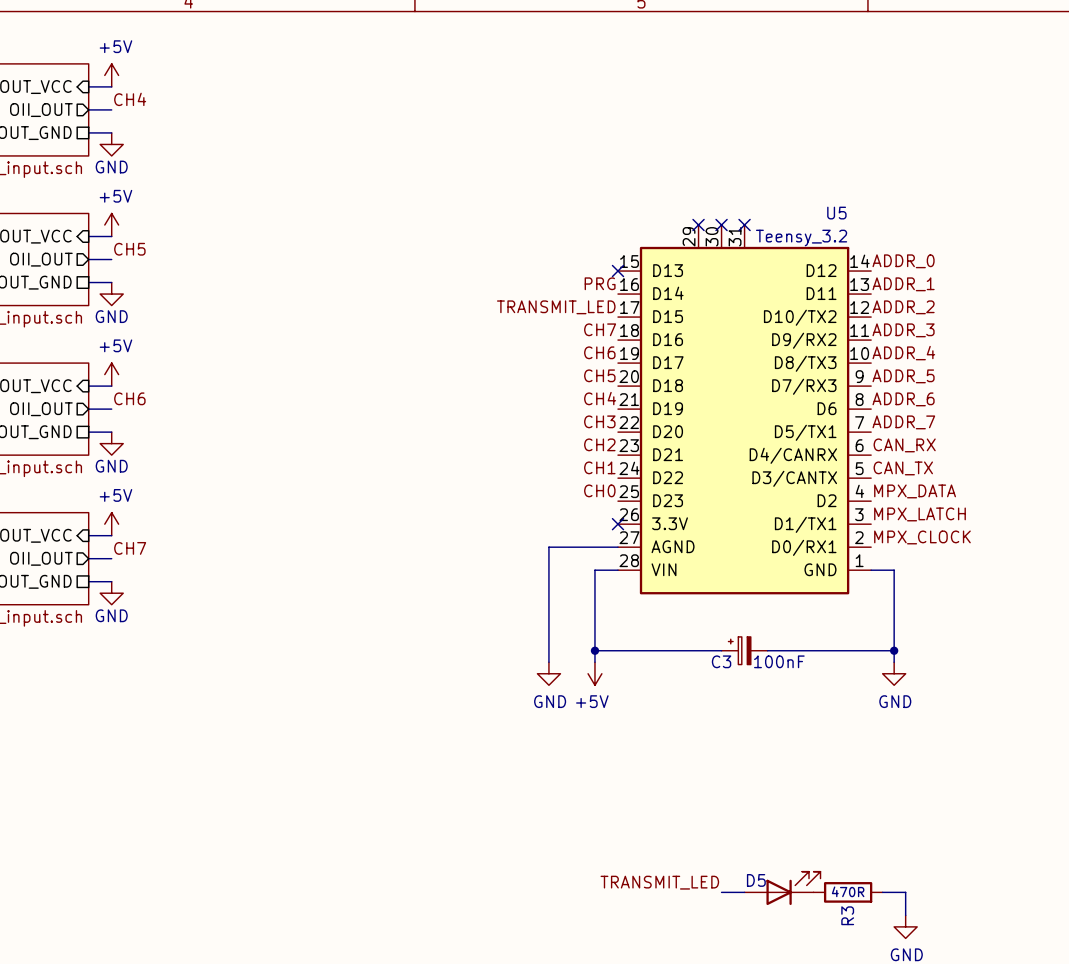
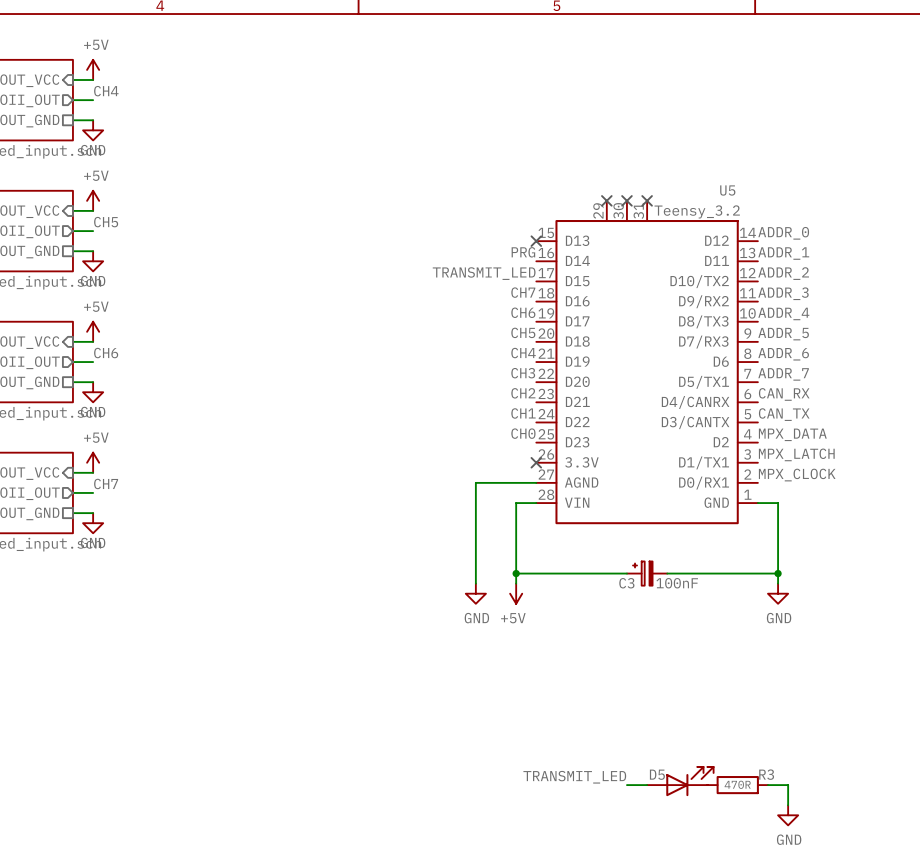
R3 name rotation: 0° (847, 915) -> 90° clockwise (766, 774)
R3 name position: R3 (847, 915) -> R3 (766, 774)

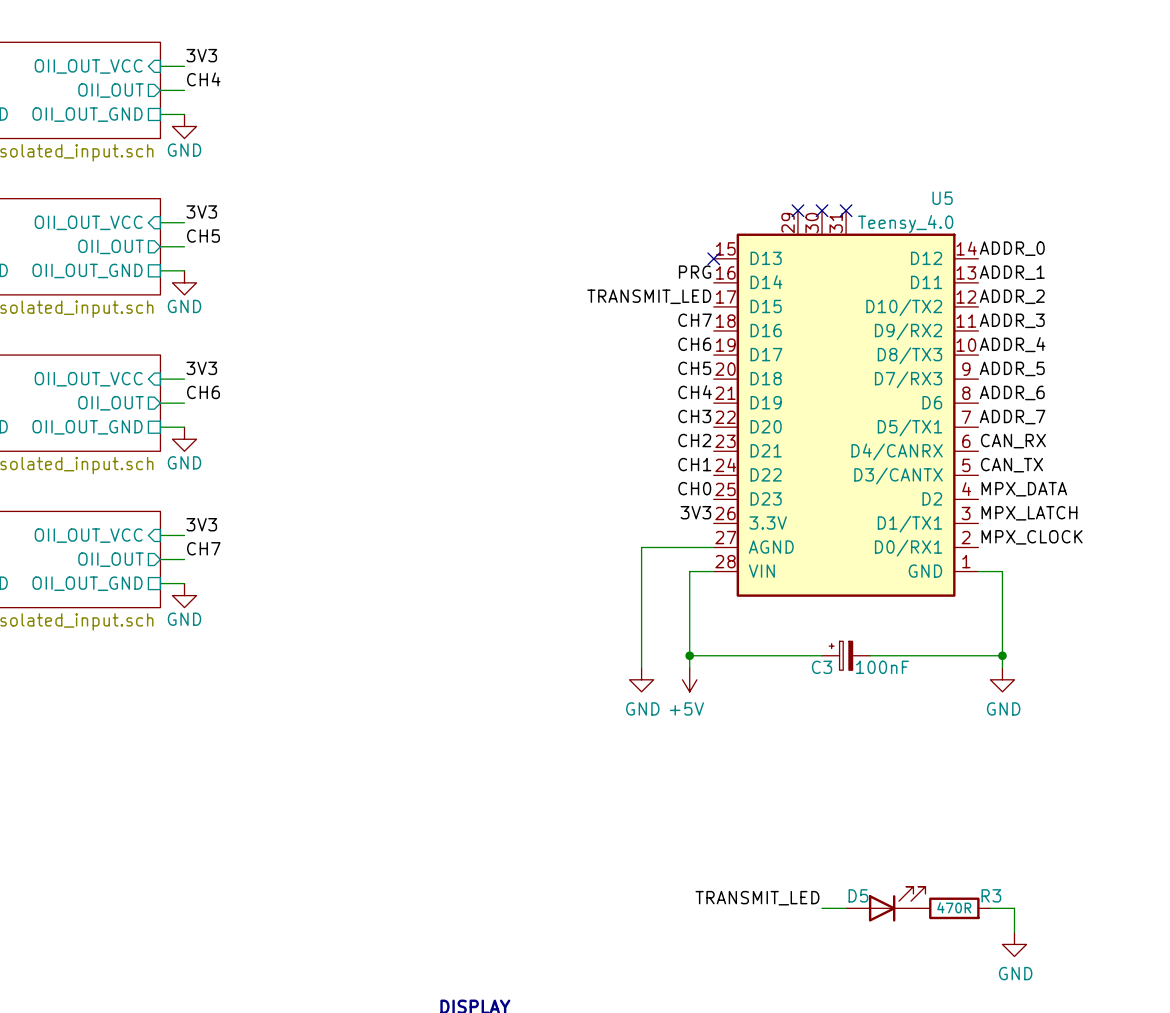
power symbol: +5V (93, 69) -> none
label: none -> 3V3 (201, 55)
power symbol: +5V (93, 200) -> none
label: none -> 3V3 (201, 211)
U5 value: Teensy_3.2 (697, 211) -> Teensy_4.0 (905, 223)
power symbol: +5V (93, 331) -> none
label: none -> 3V3 (201, 368)
label: none -> 3V3 (695, 512)
power symbol: +5V (93, 462) -> none
no-connect mark: (536, 462) -> none
label: none -> 3V3 (201, 524)

